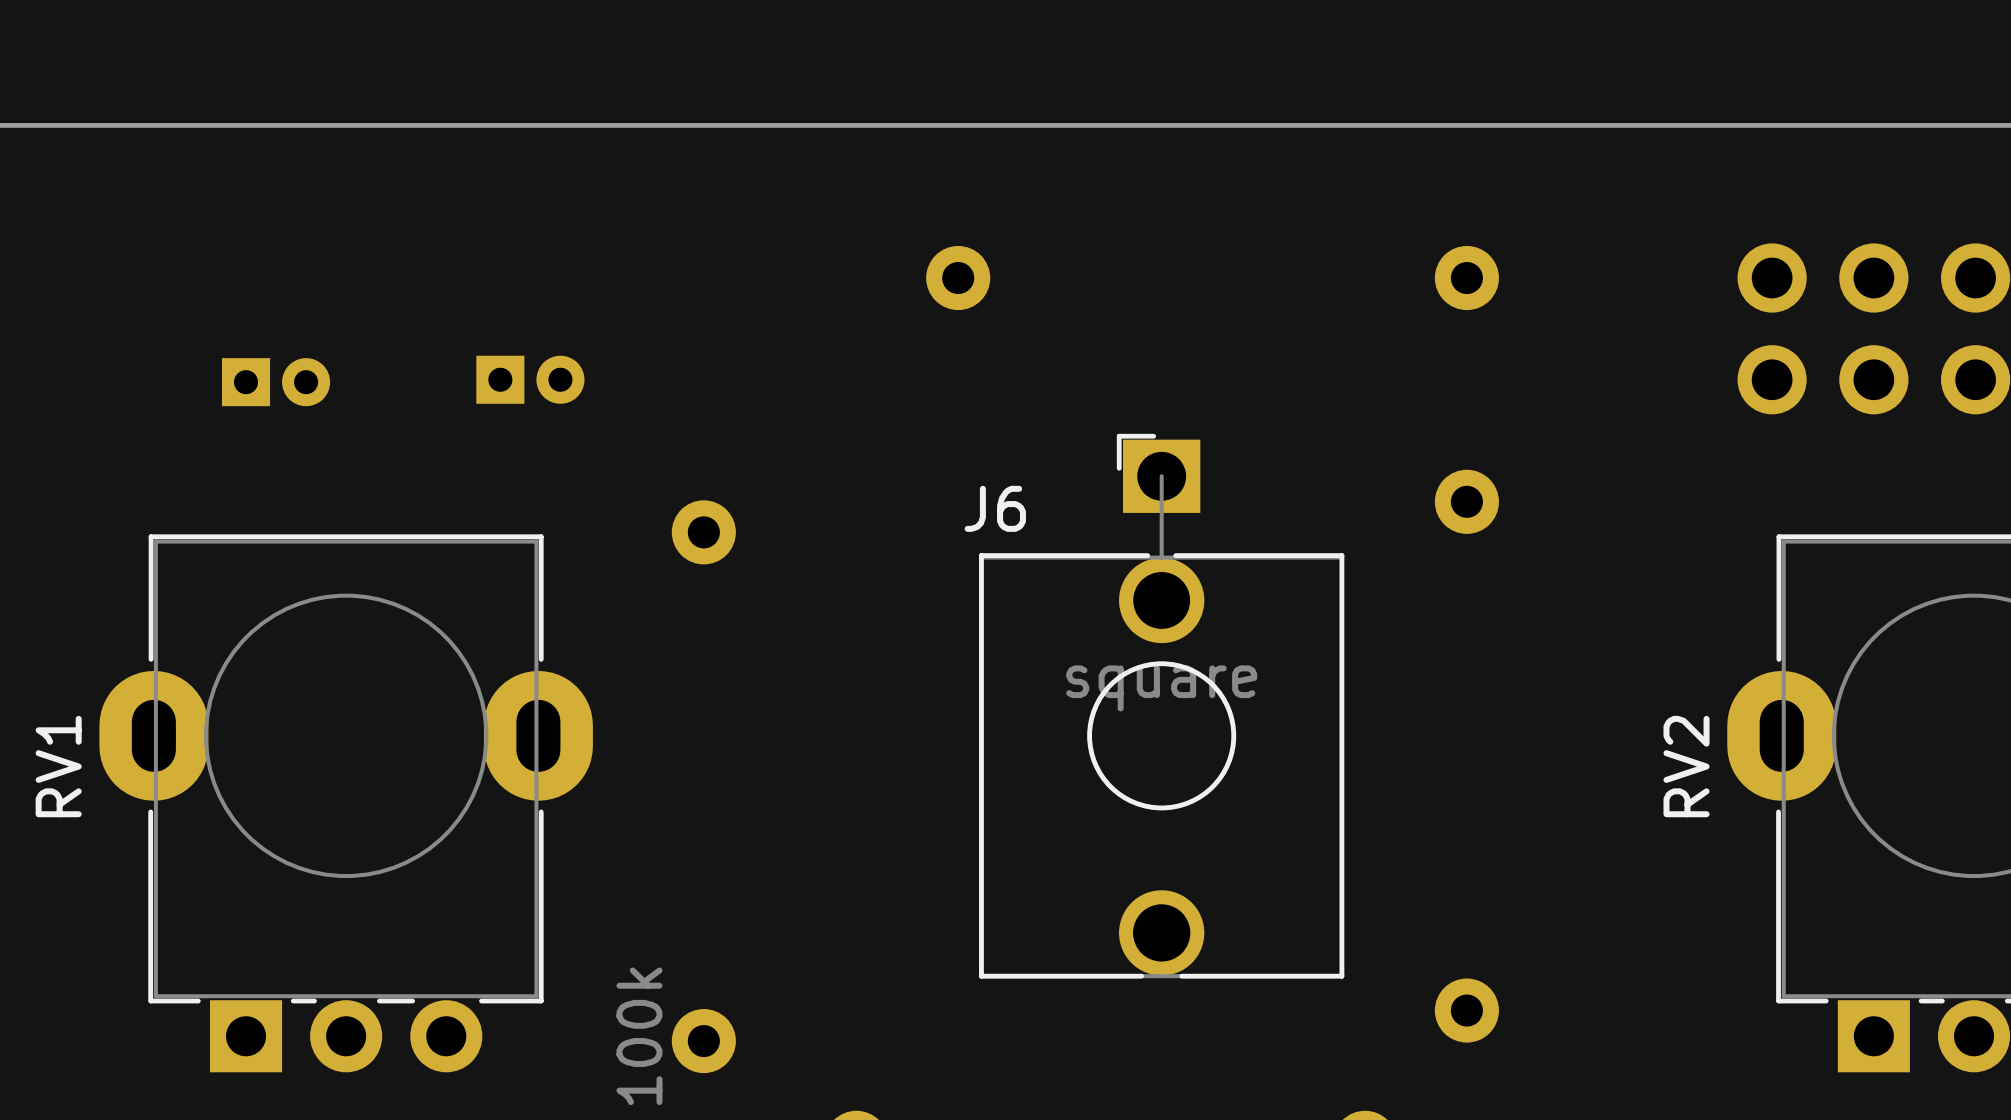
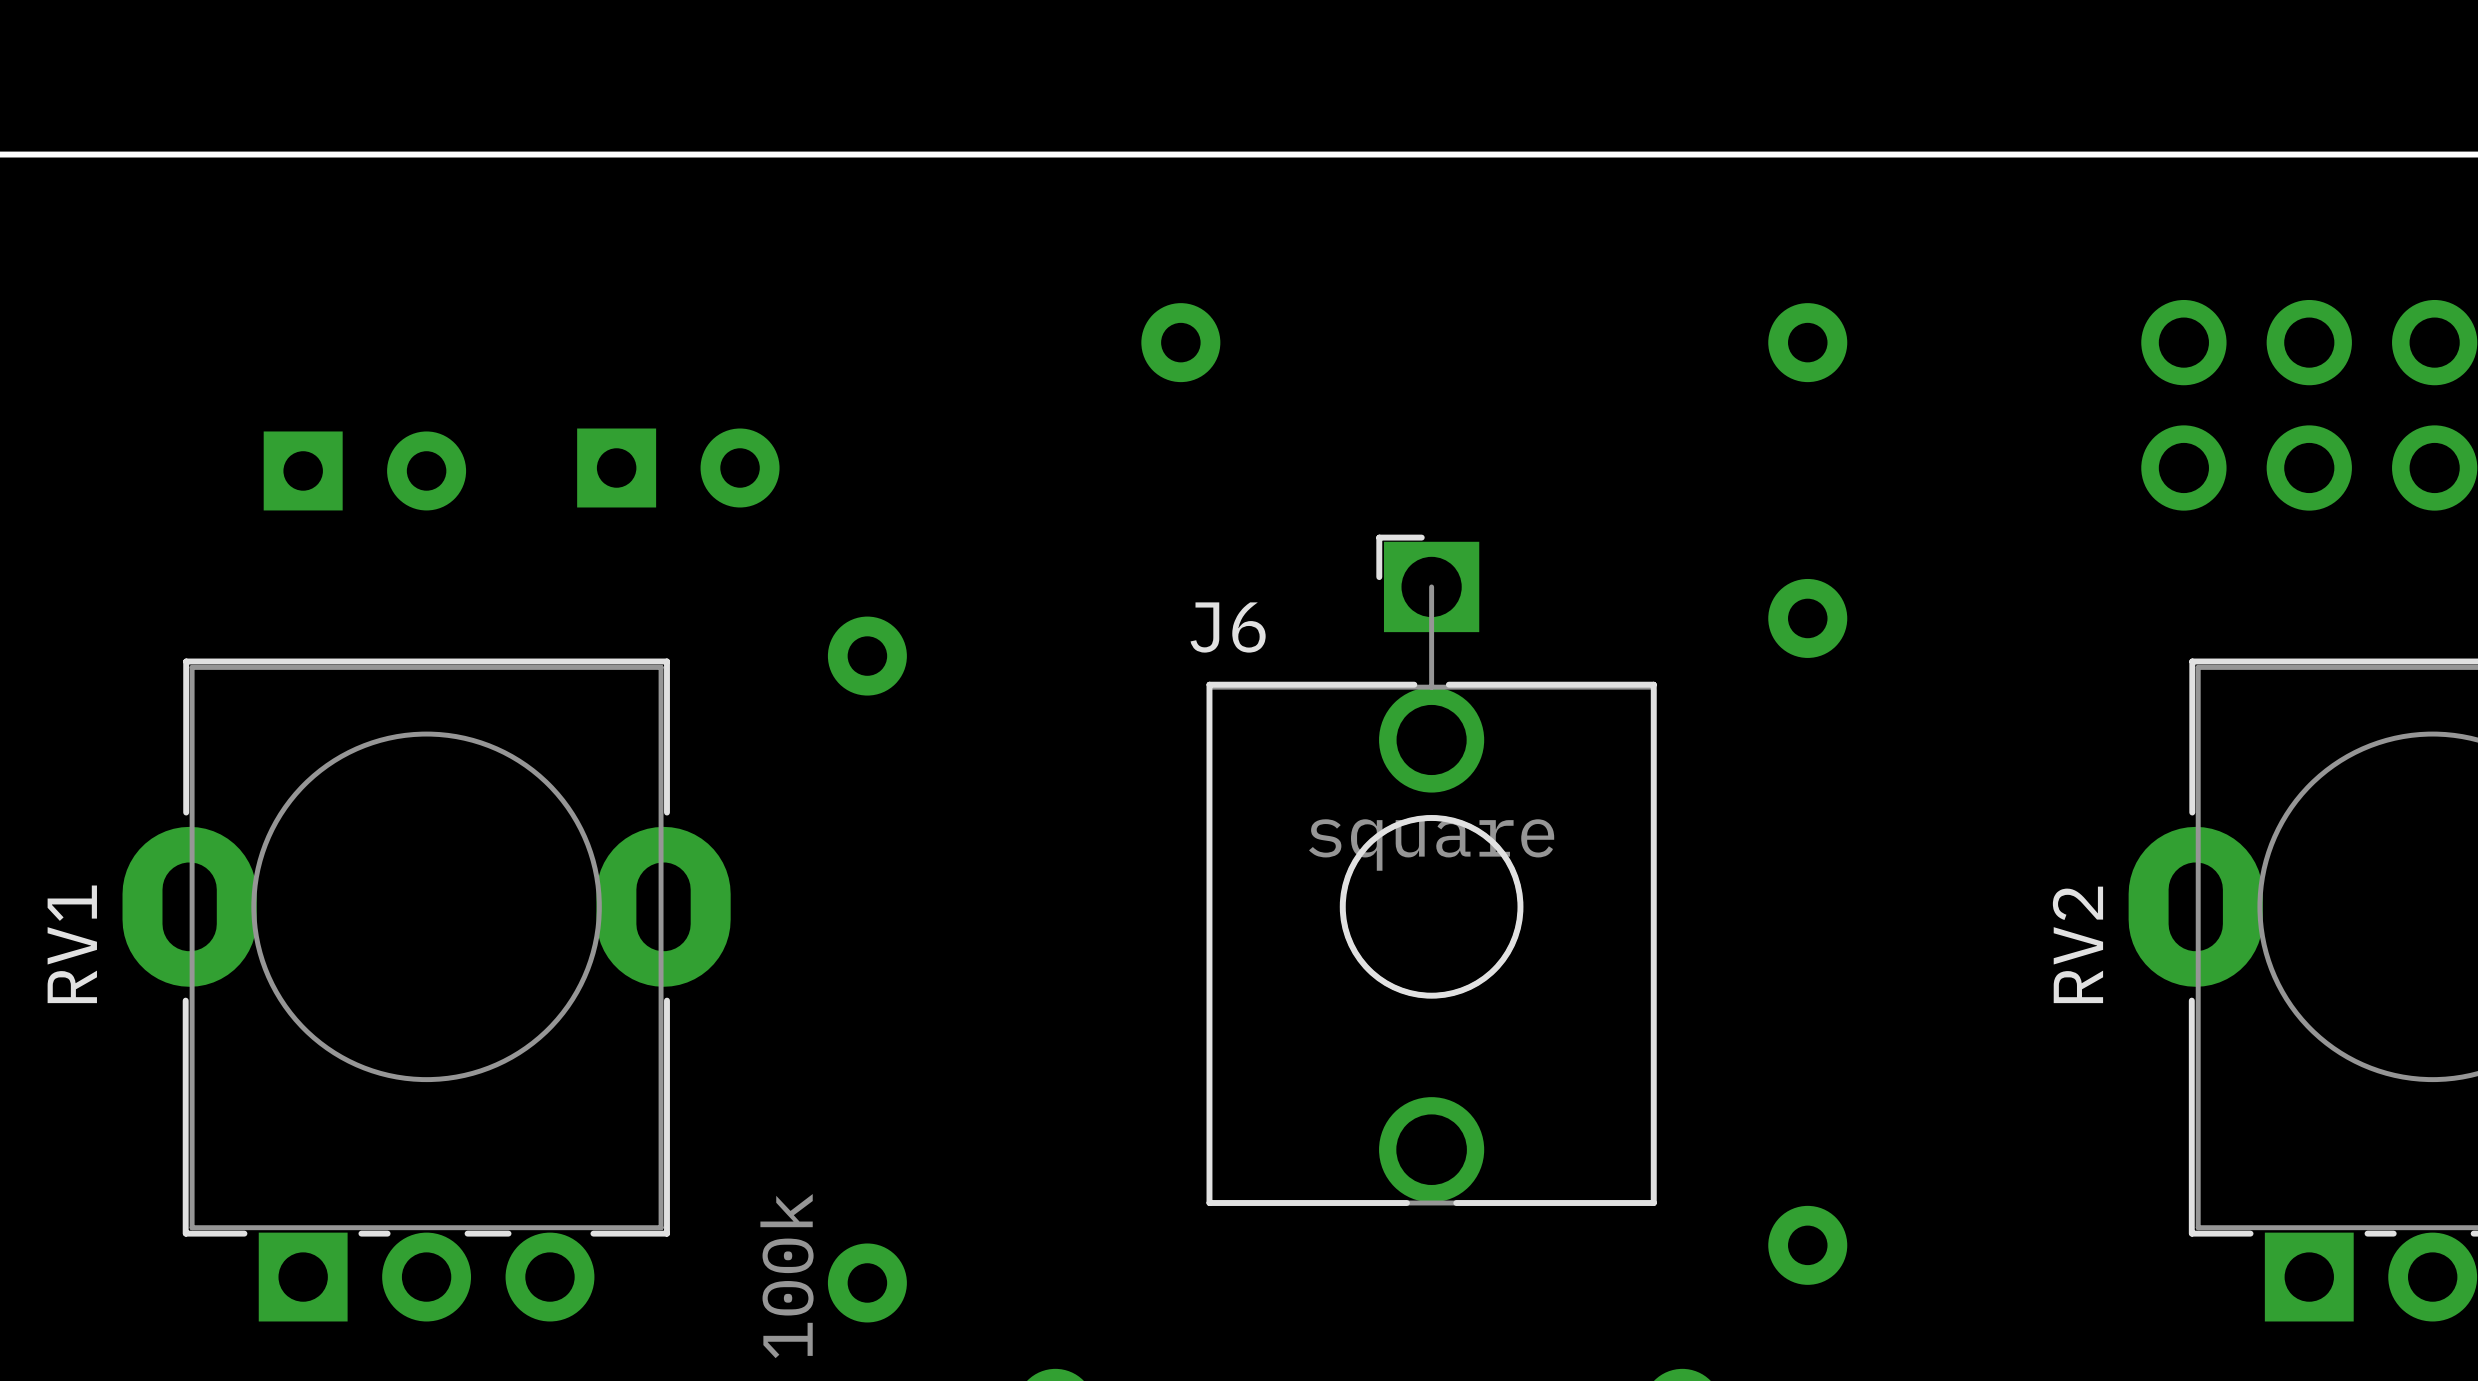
part footprint: [476, 355, 585, 404] -> [577, 428, 780, 508]
part footprint: [221, 358, 331, 407] -> [263, 431, 467, 511]

